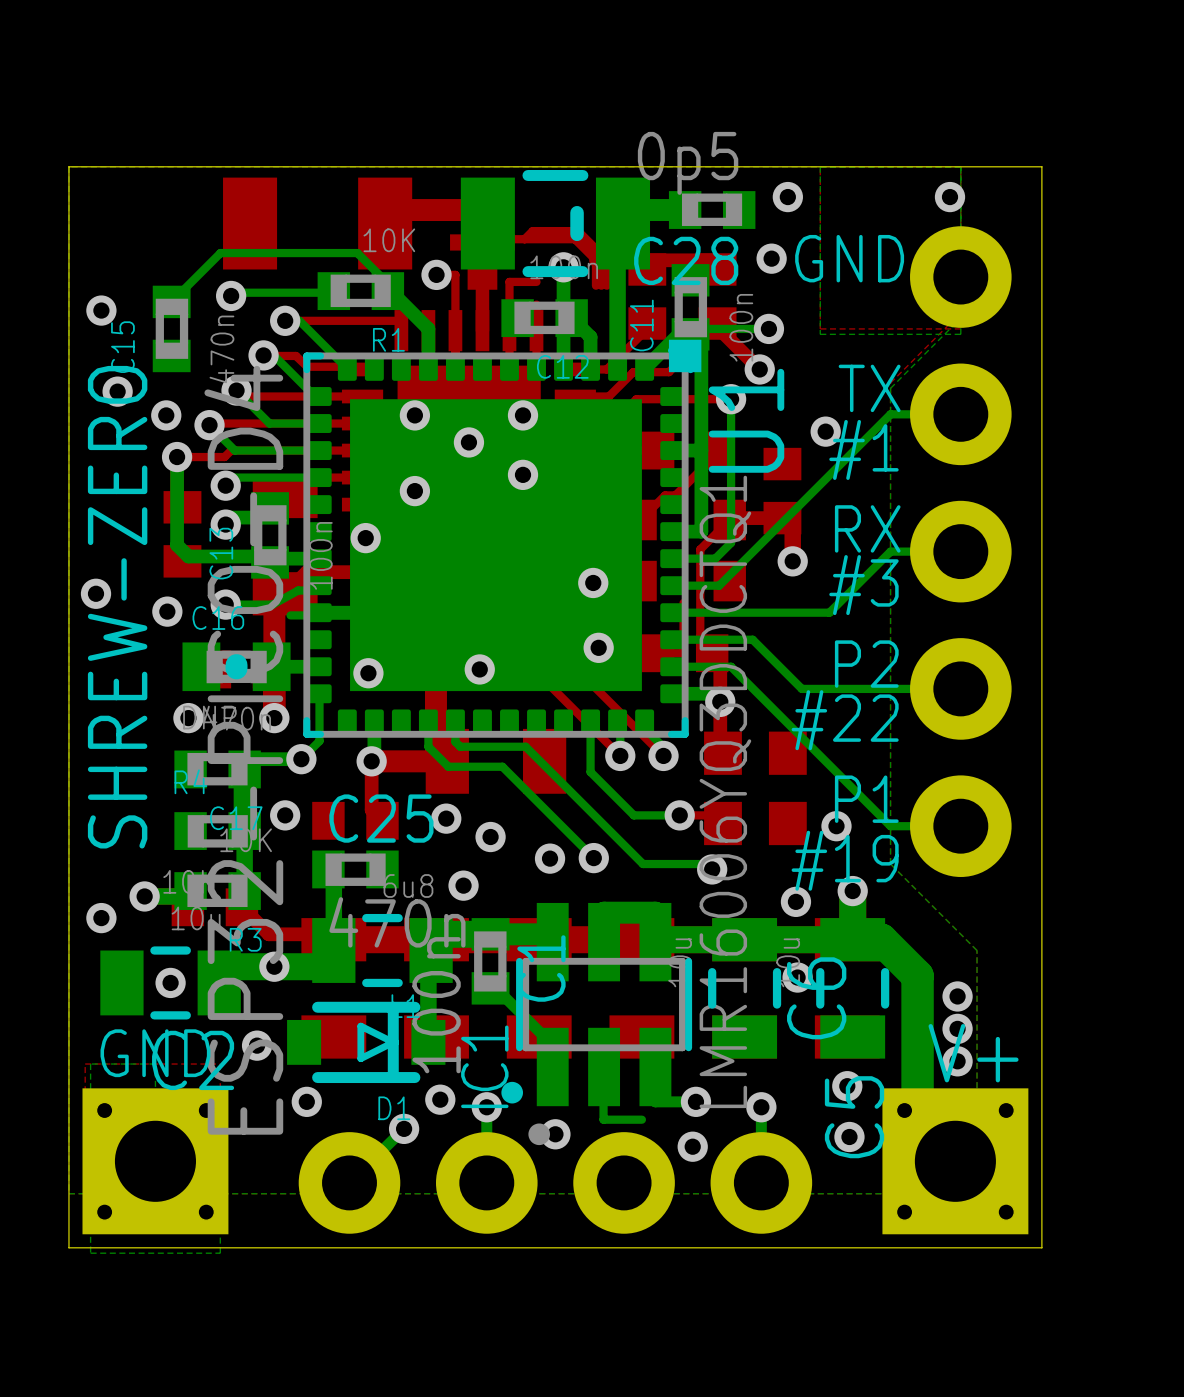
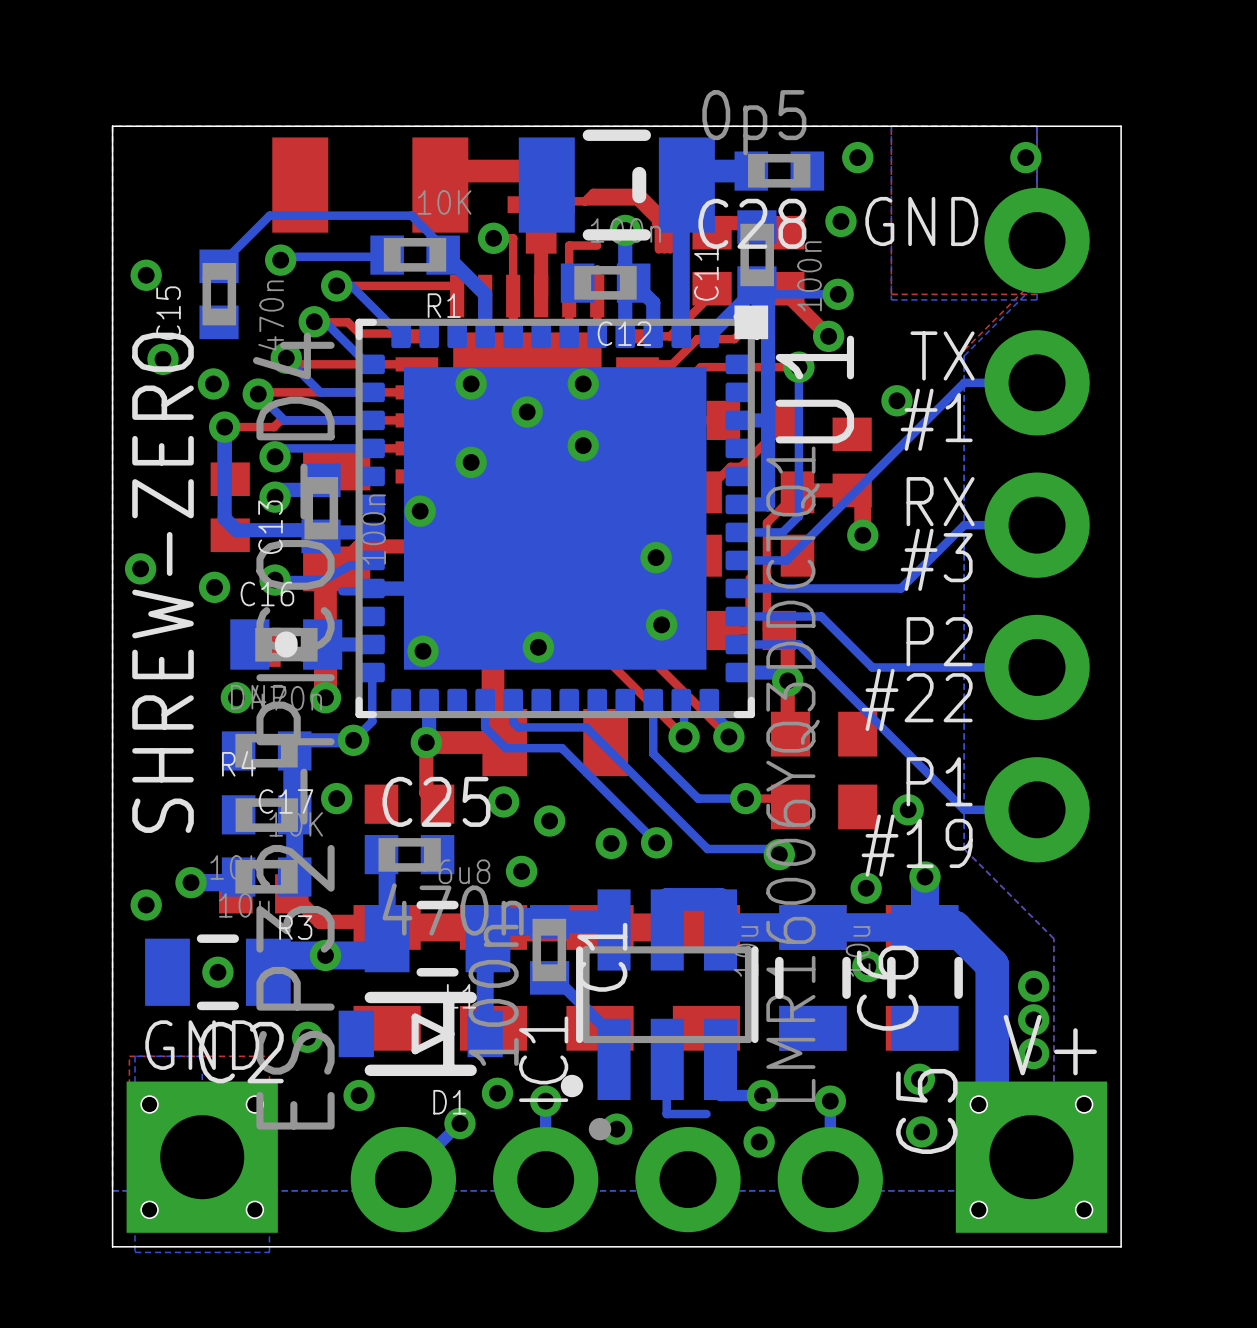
C11 position: (690, 307) -> (756, 255)

